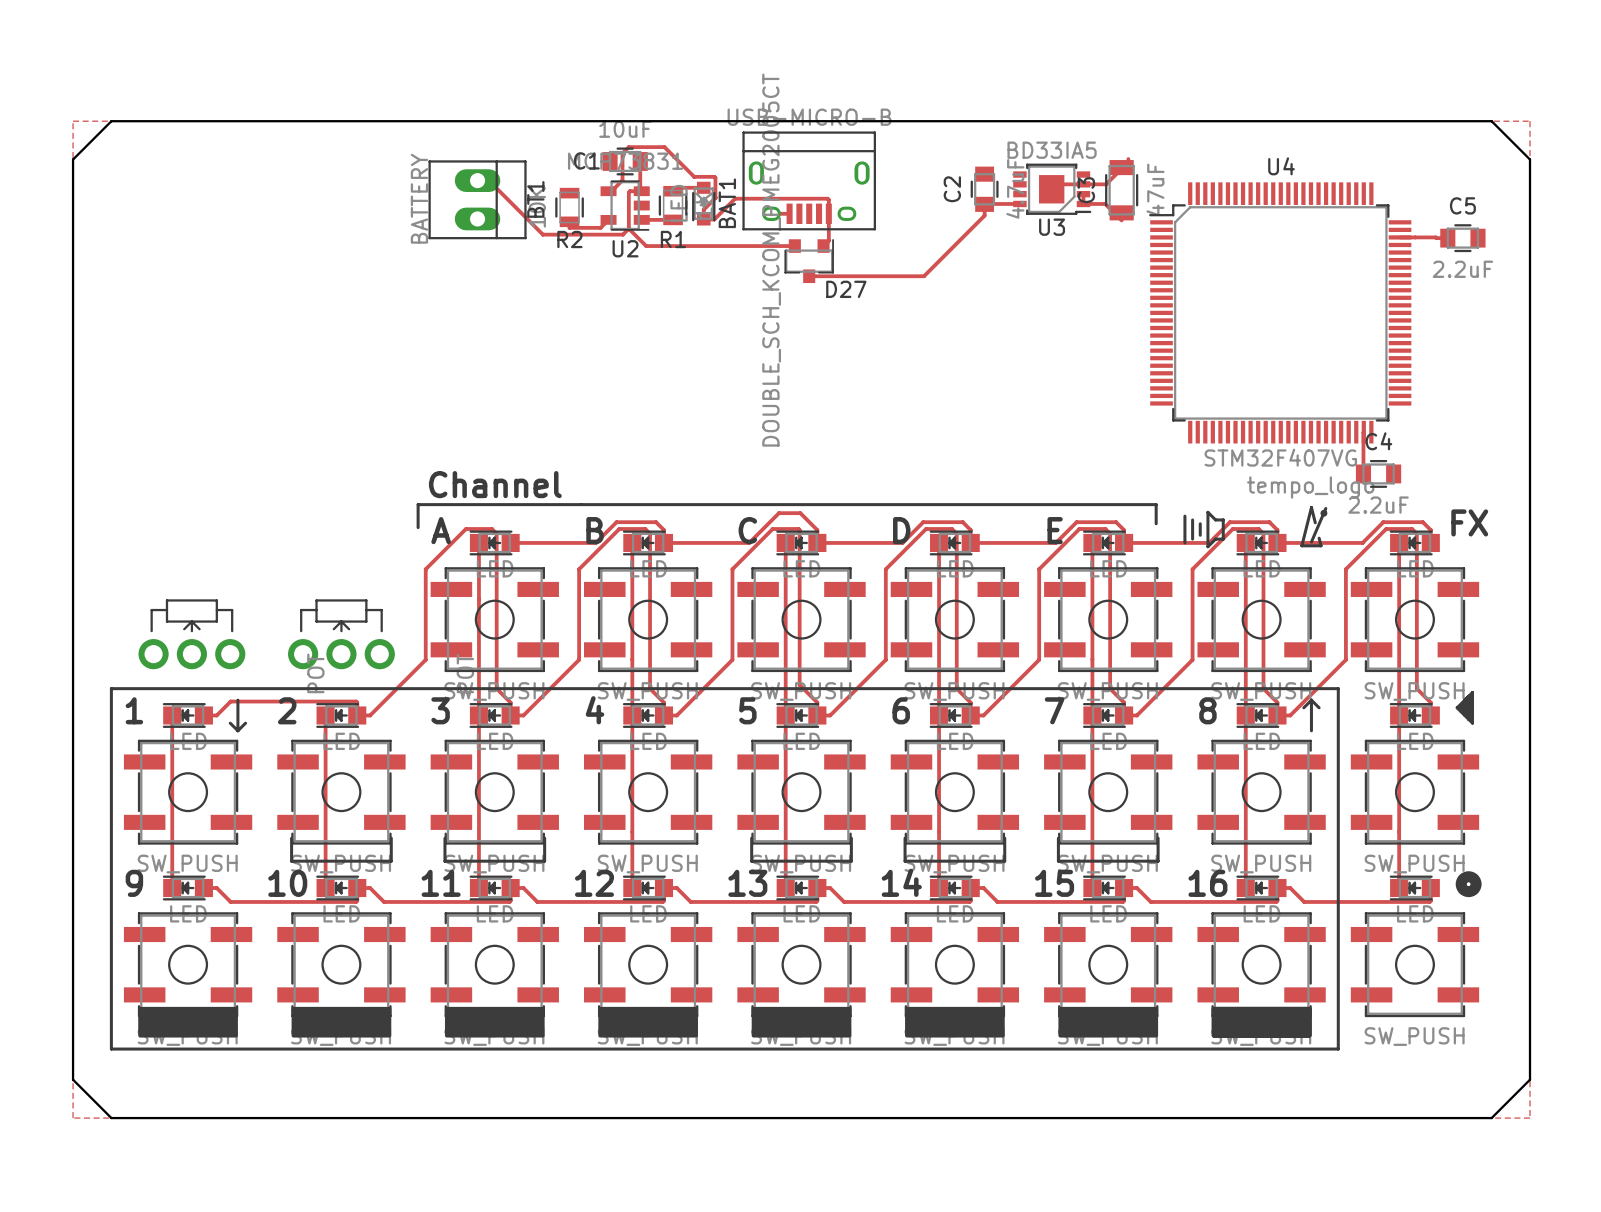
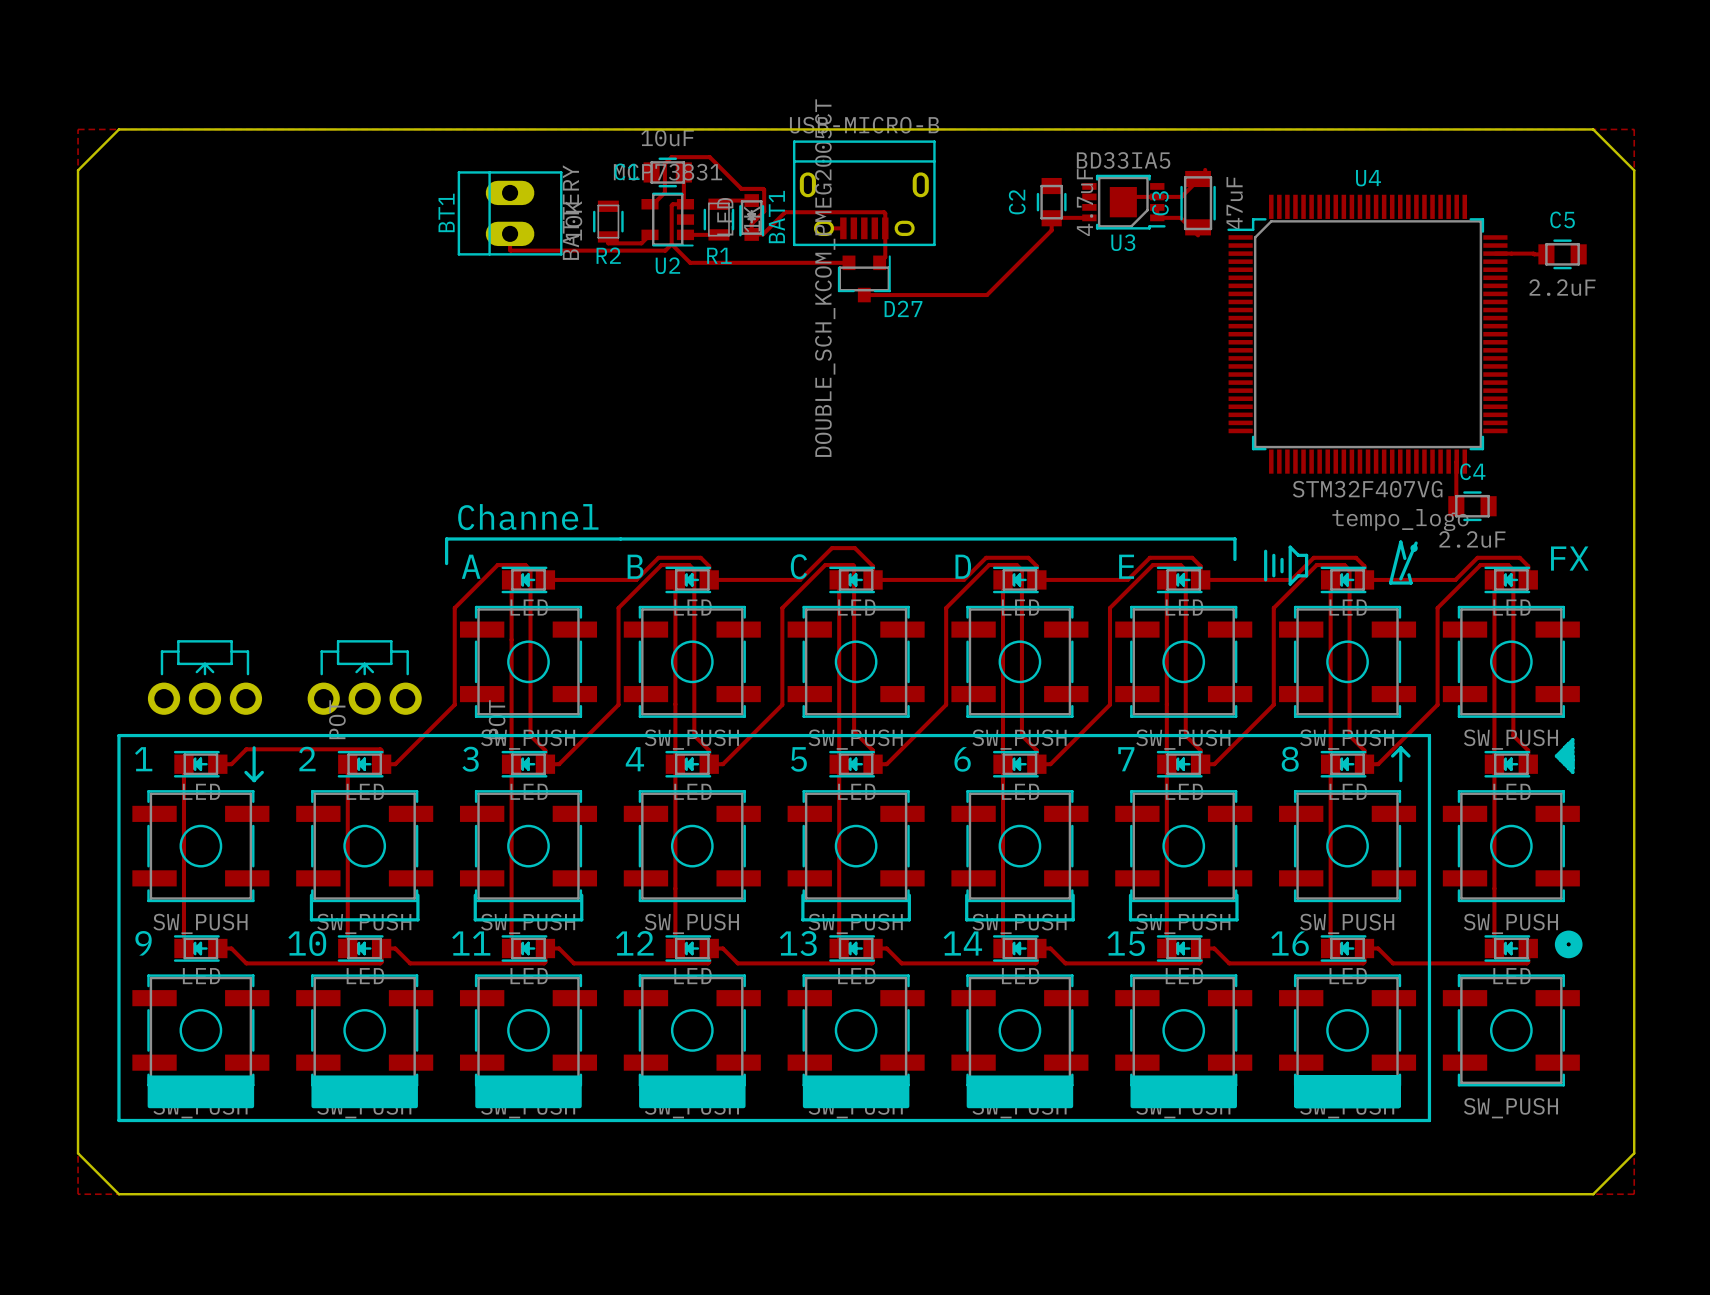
track: (477, 180) (488, 180) (542, 234) -> (510, 233) (510, 250) (579, 250)
BT1 rotation: 0° (477, 199) -> 180° (510, 213)

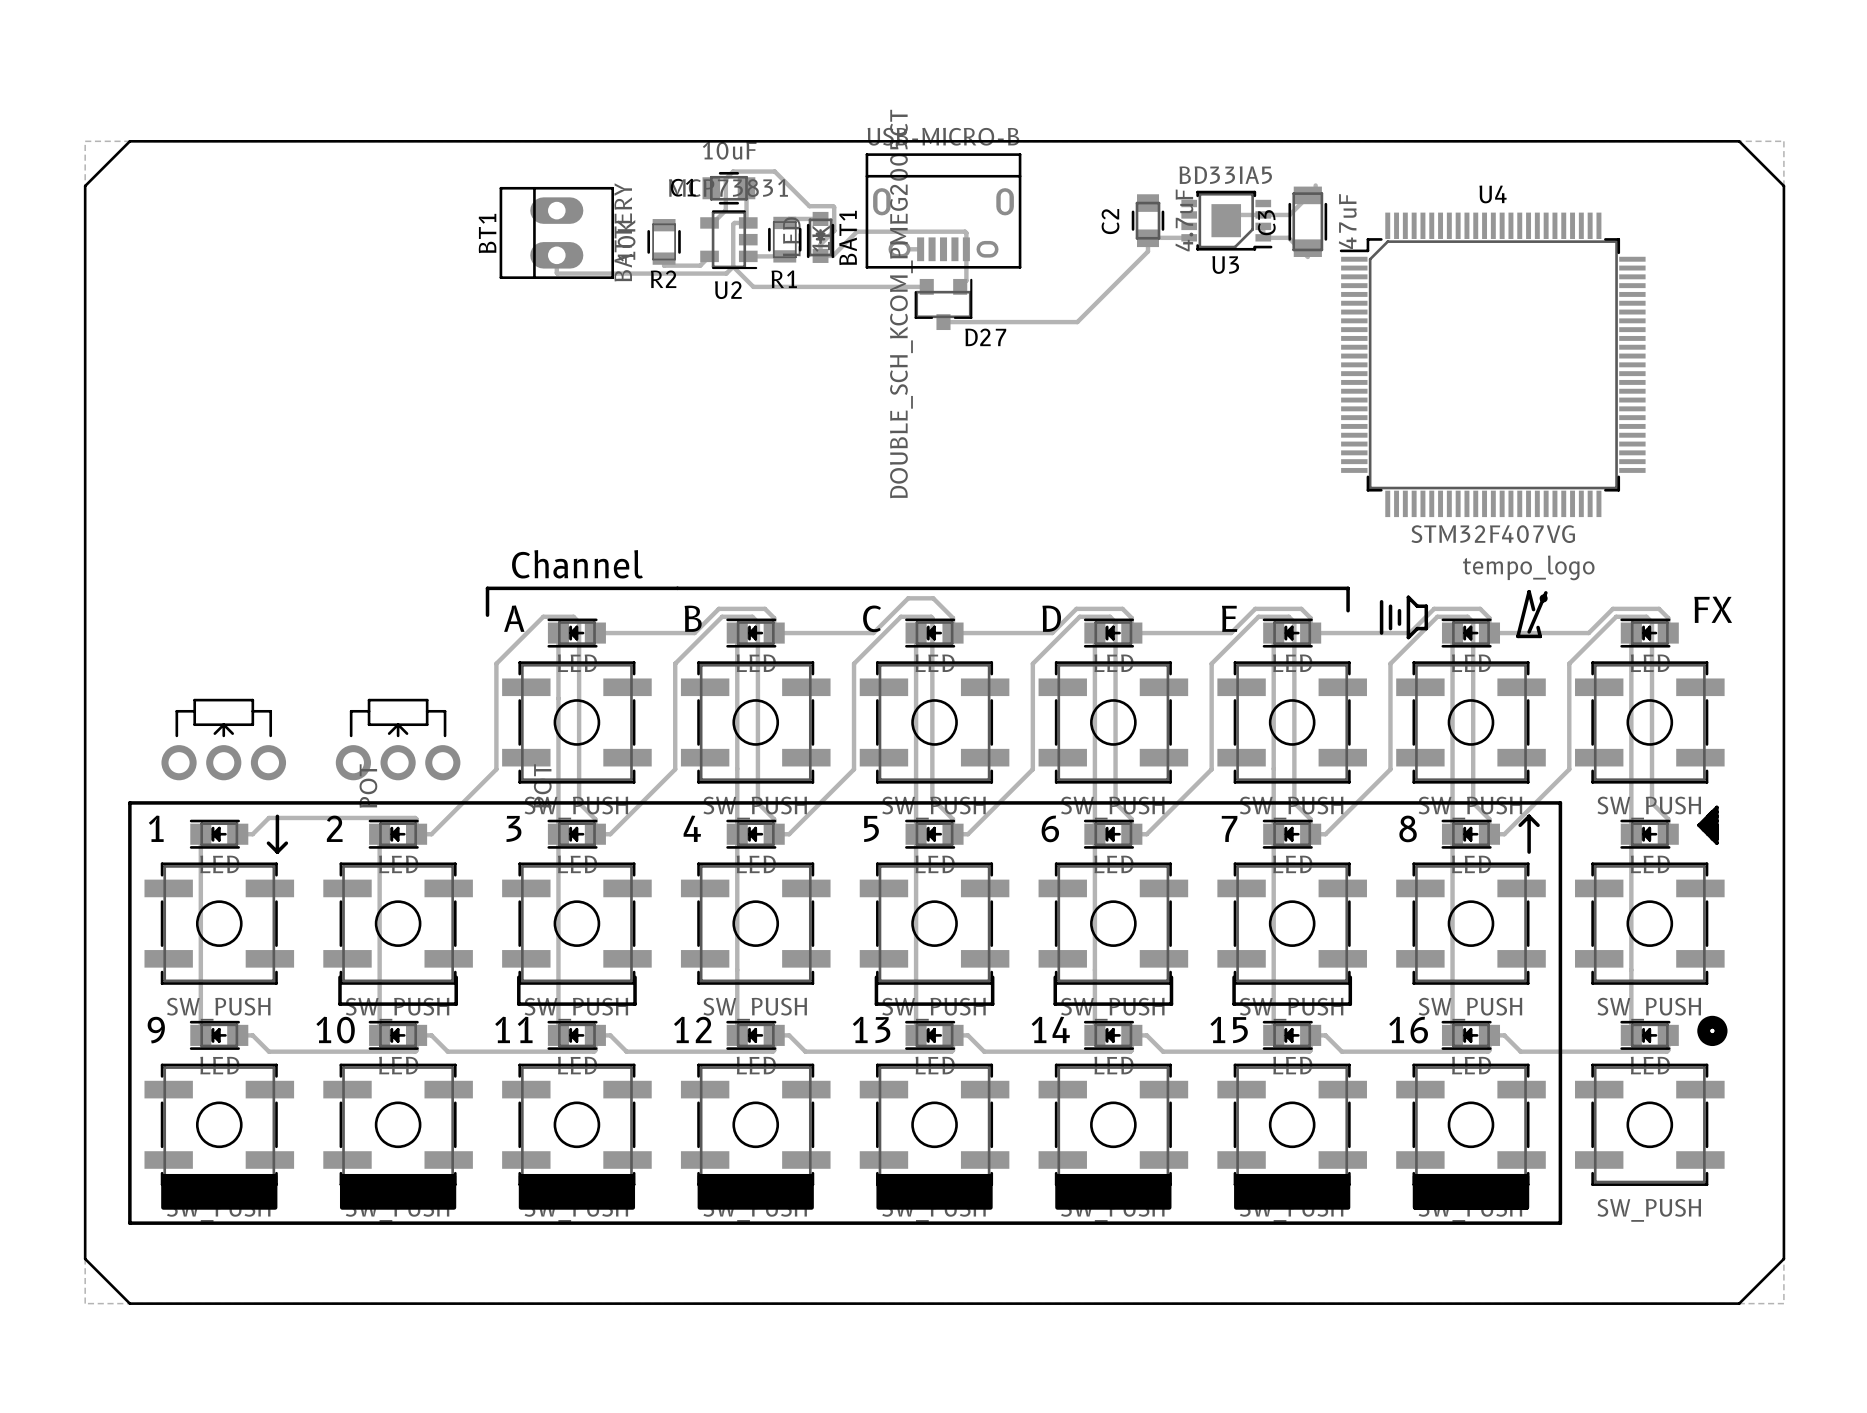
track: (1495, 253) (1546, 254) -> none
C5: 2.2uF (1562, 254) -> none
track: (1456, 461) (1456, 506) -> none
C4: 2.2uF (1472, 506) -> none

